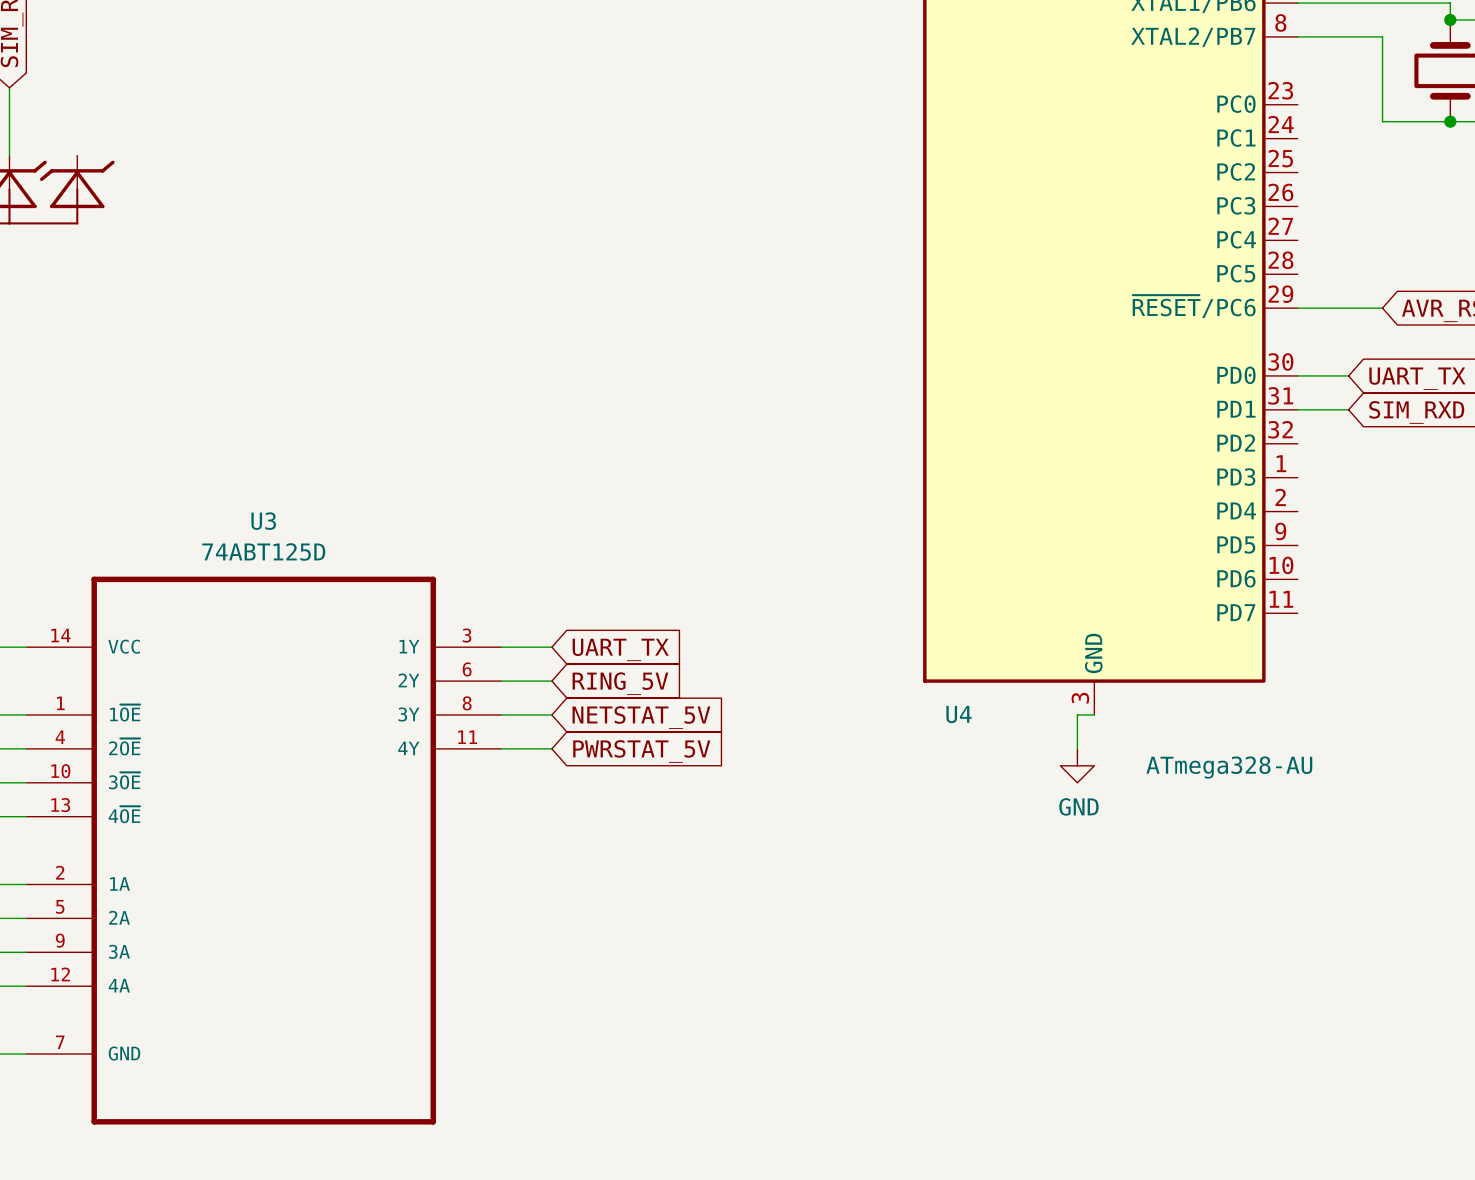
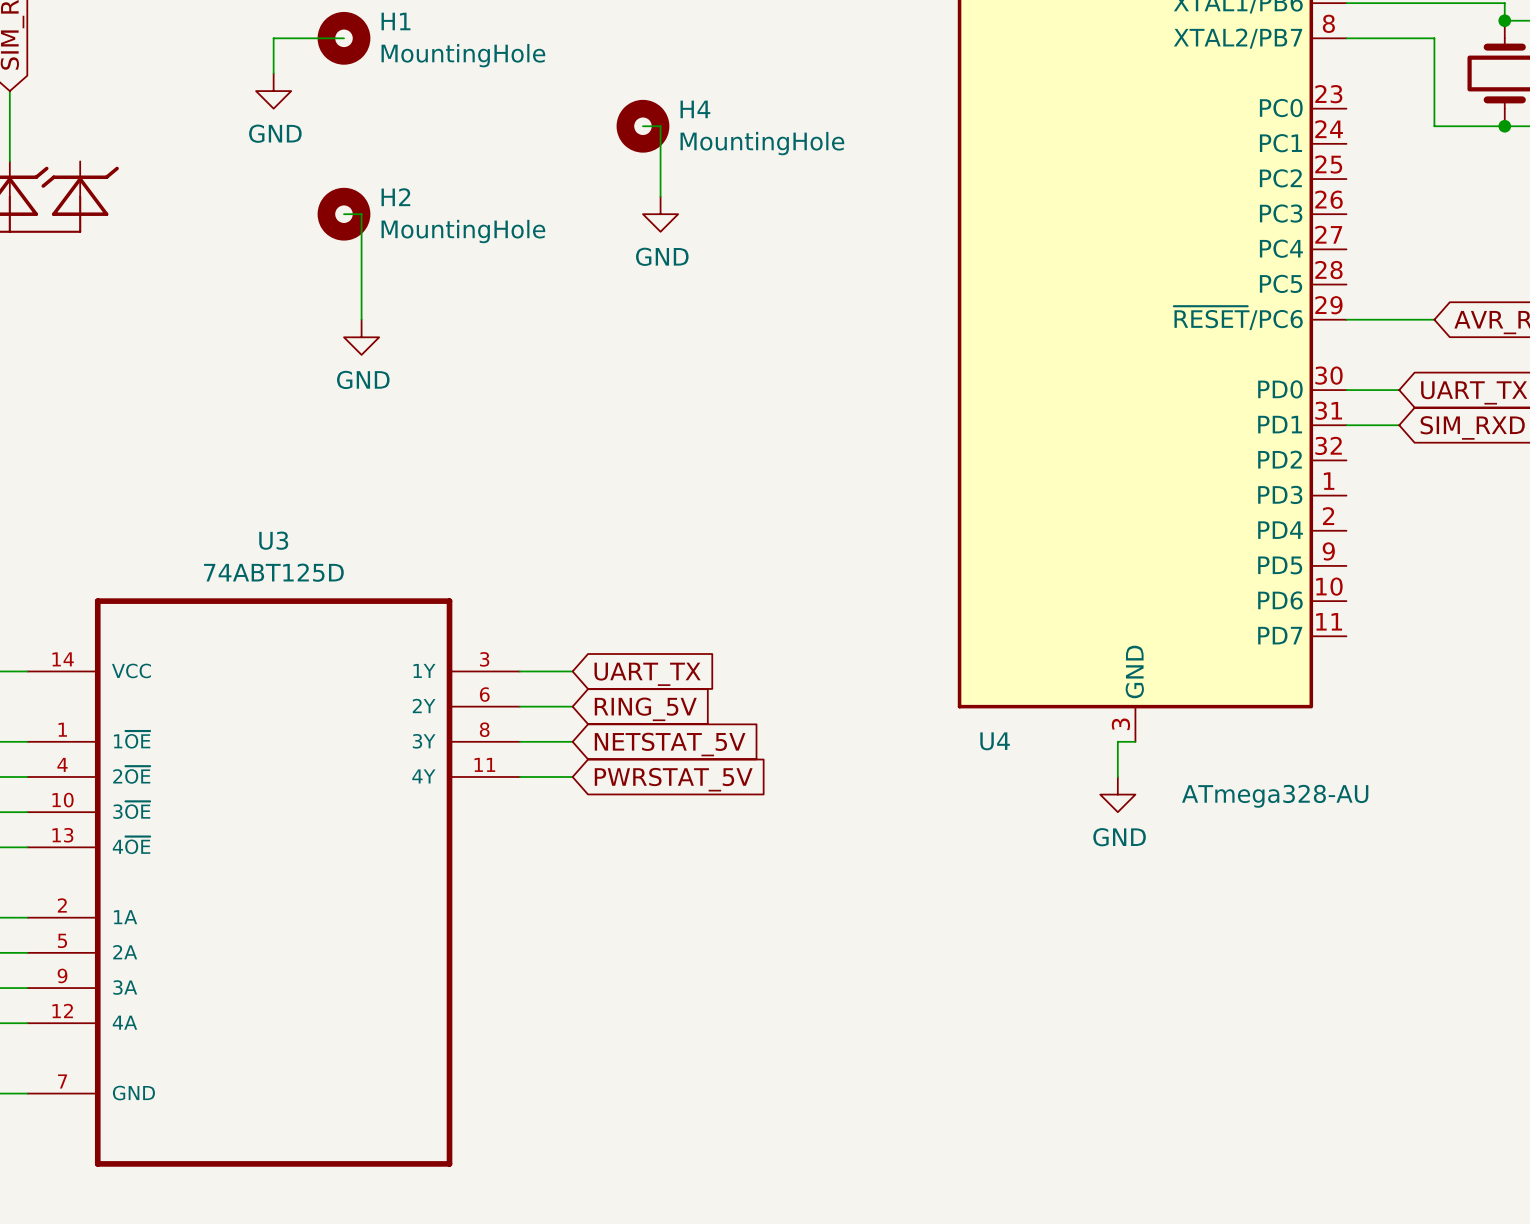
wire: none -> (343, 38) (273, 38) (273, 73)
H1: none -> MountingHole (343, 38)
power symbol: none -> GND (273, 91)
wire: none -> (642, 126) (660, 126) (660, 196)
H4: none -> MountingHole (642, 126)
wire: none -> (343, 214) (361, 214) (361, 319)
H2: none -> MountingHole (343, 214)
power symbol: none -> GND (660, 214)
power symbol: none -> GND (361, 337)

